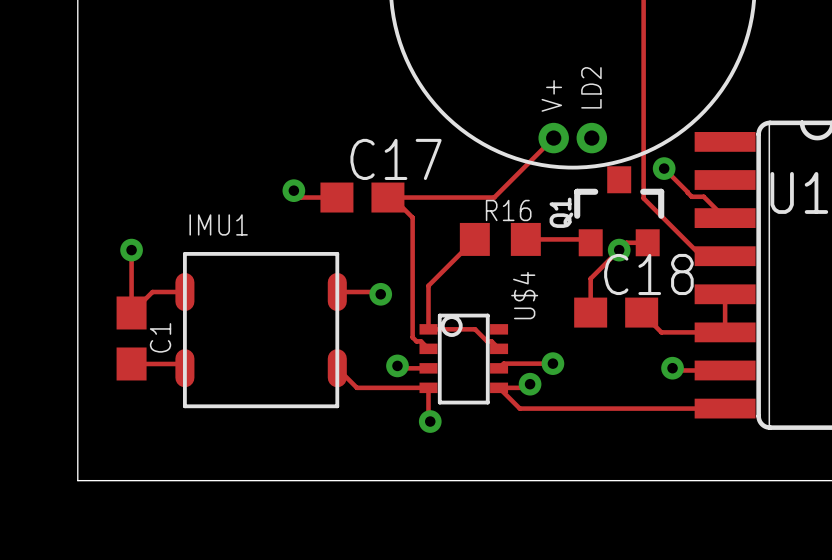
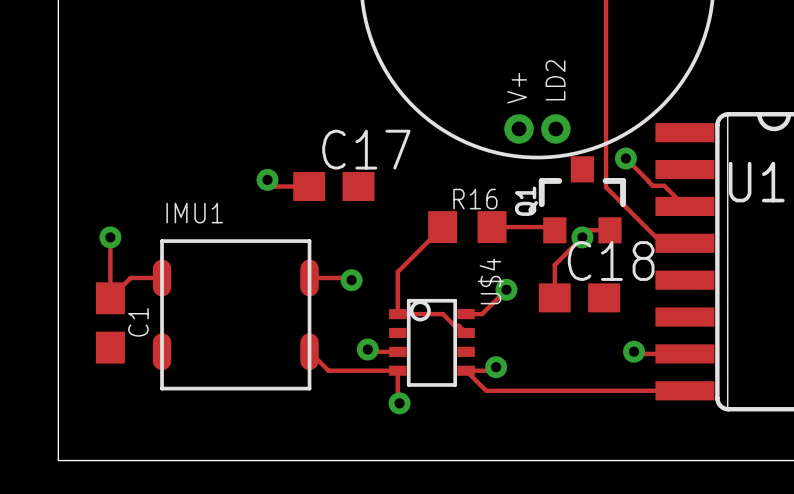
track: (553, 138) (494, 197) (392, 197) (412, 217) (412, 337) (416, 341) (421, 341) (428, 348) -> none
track: (725, 294) (725, 332) (661, 332) (641, 312) -> none
track: none -> (506, 289) (482, 314) (466, 314)
track: (131, 363) (184, 363) -> none
track: (552, 363) (503, 363) (499, 368) -> none
via position: (552, 363) -> (506, 289)

